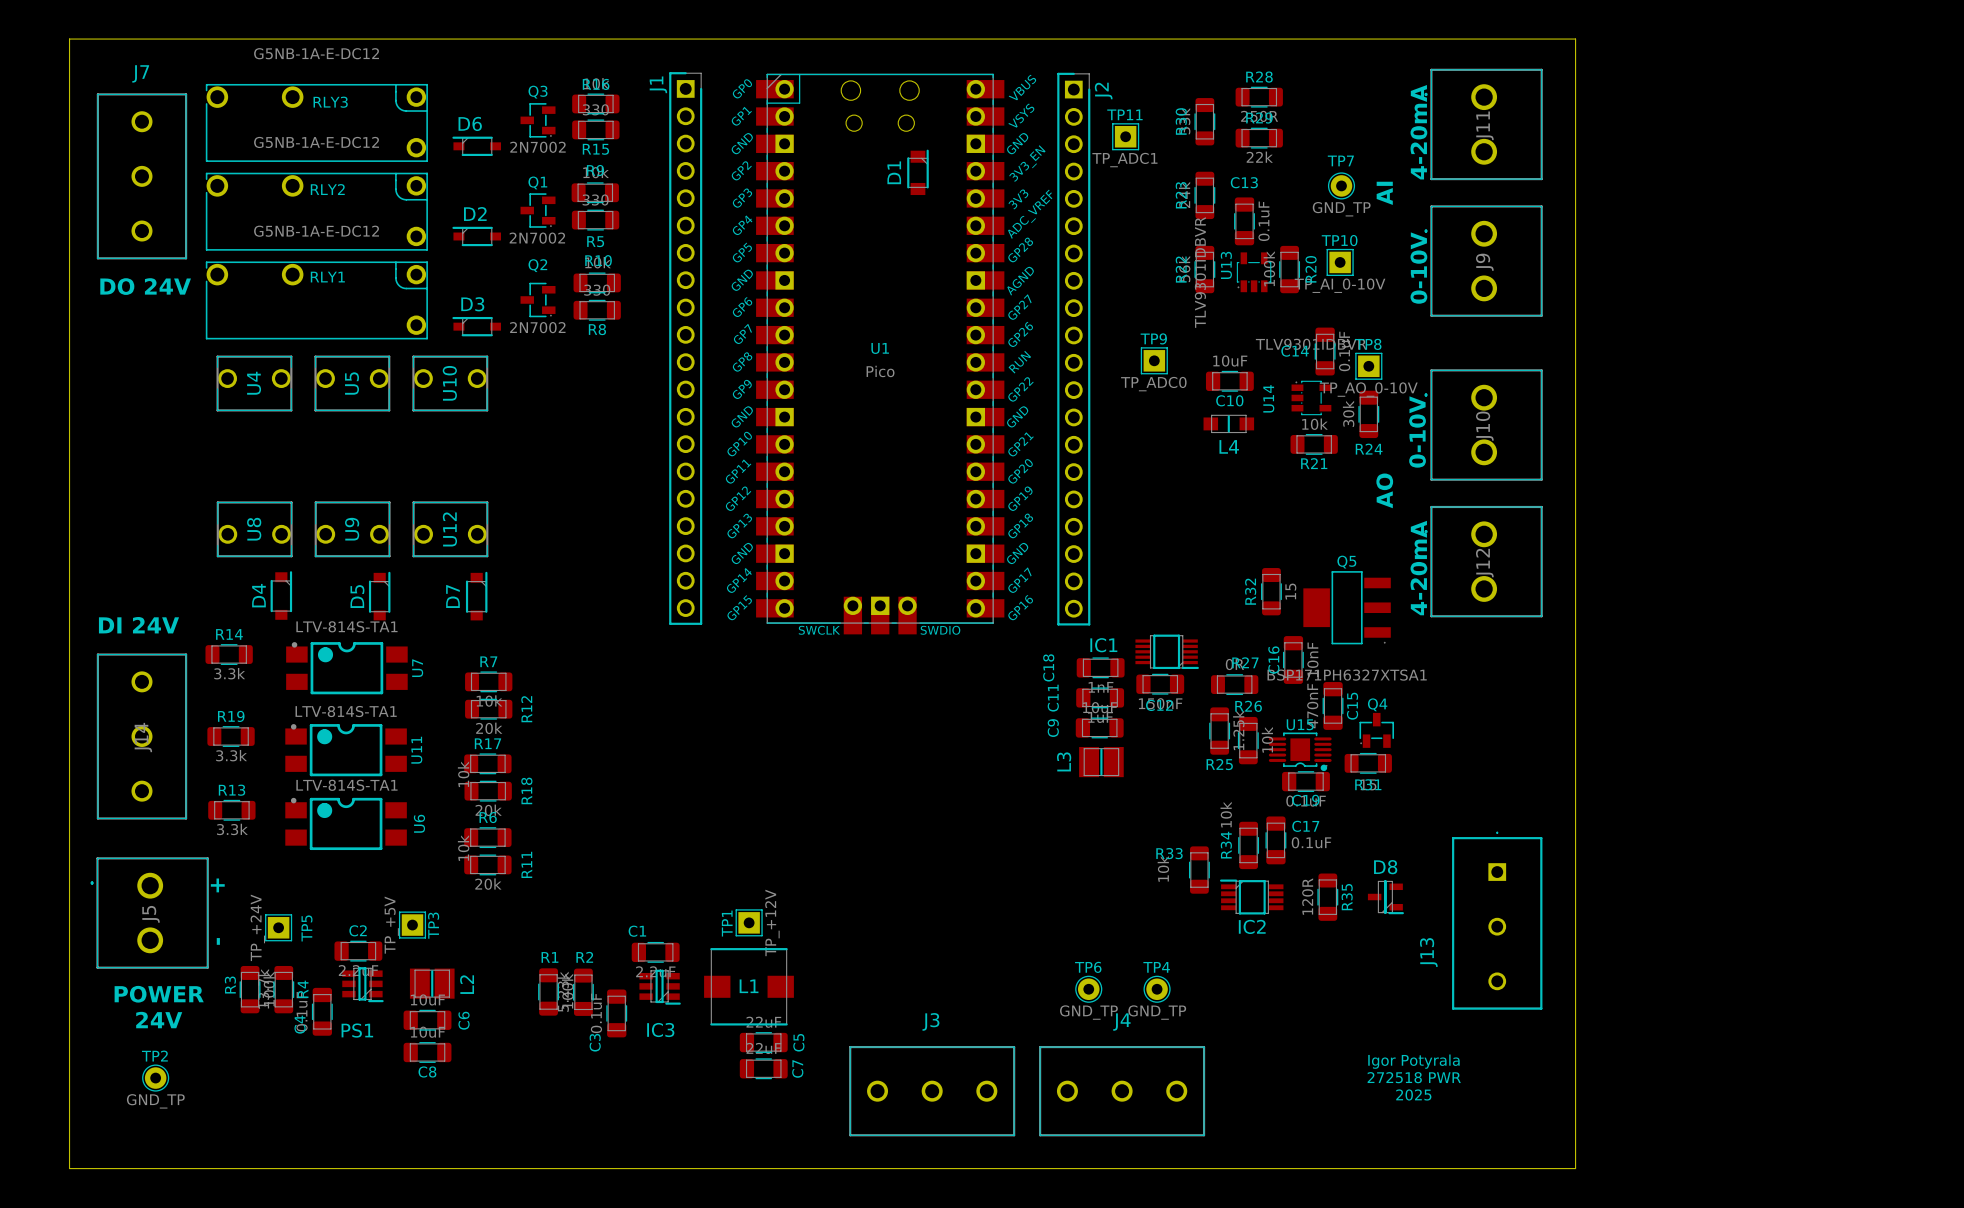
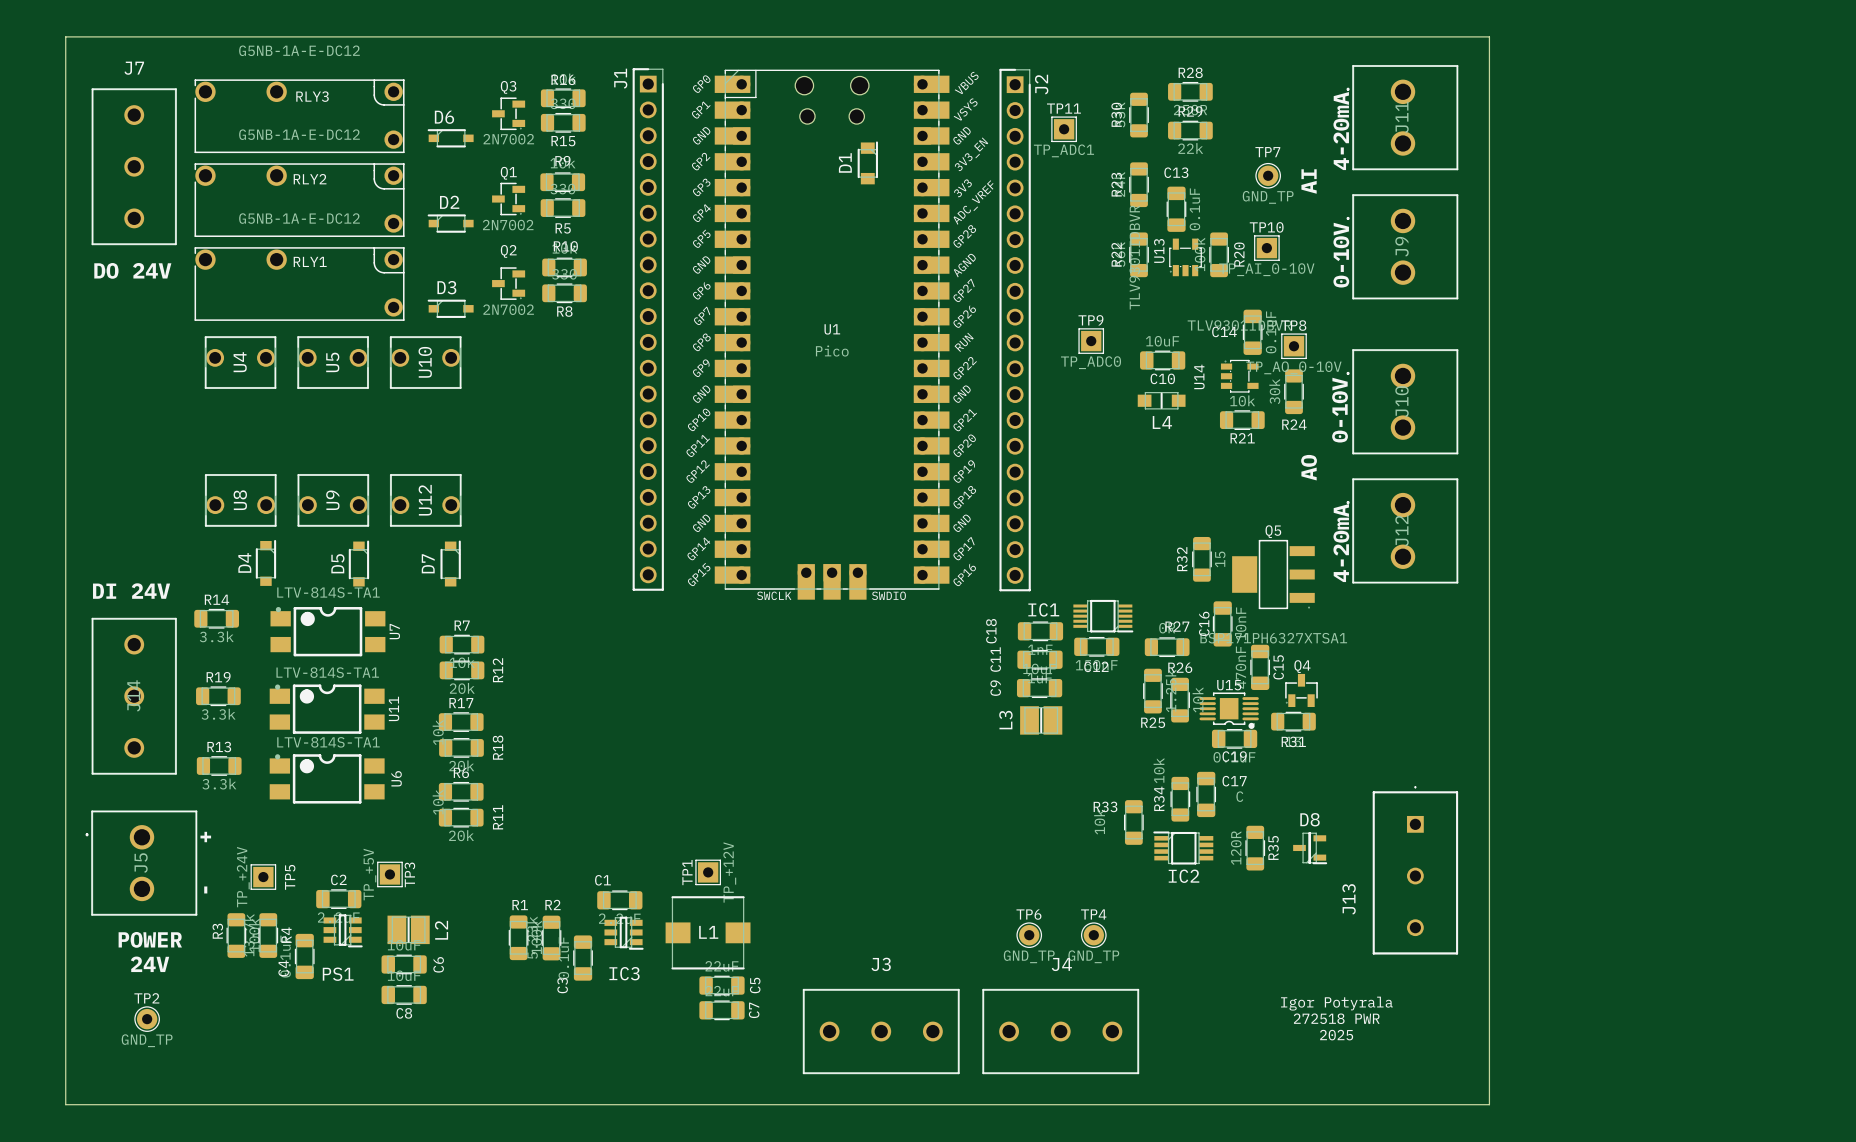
C17 value: 0.1uF (1311, 842) -> C (1239, 796)

